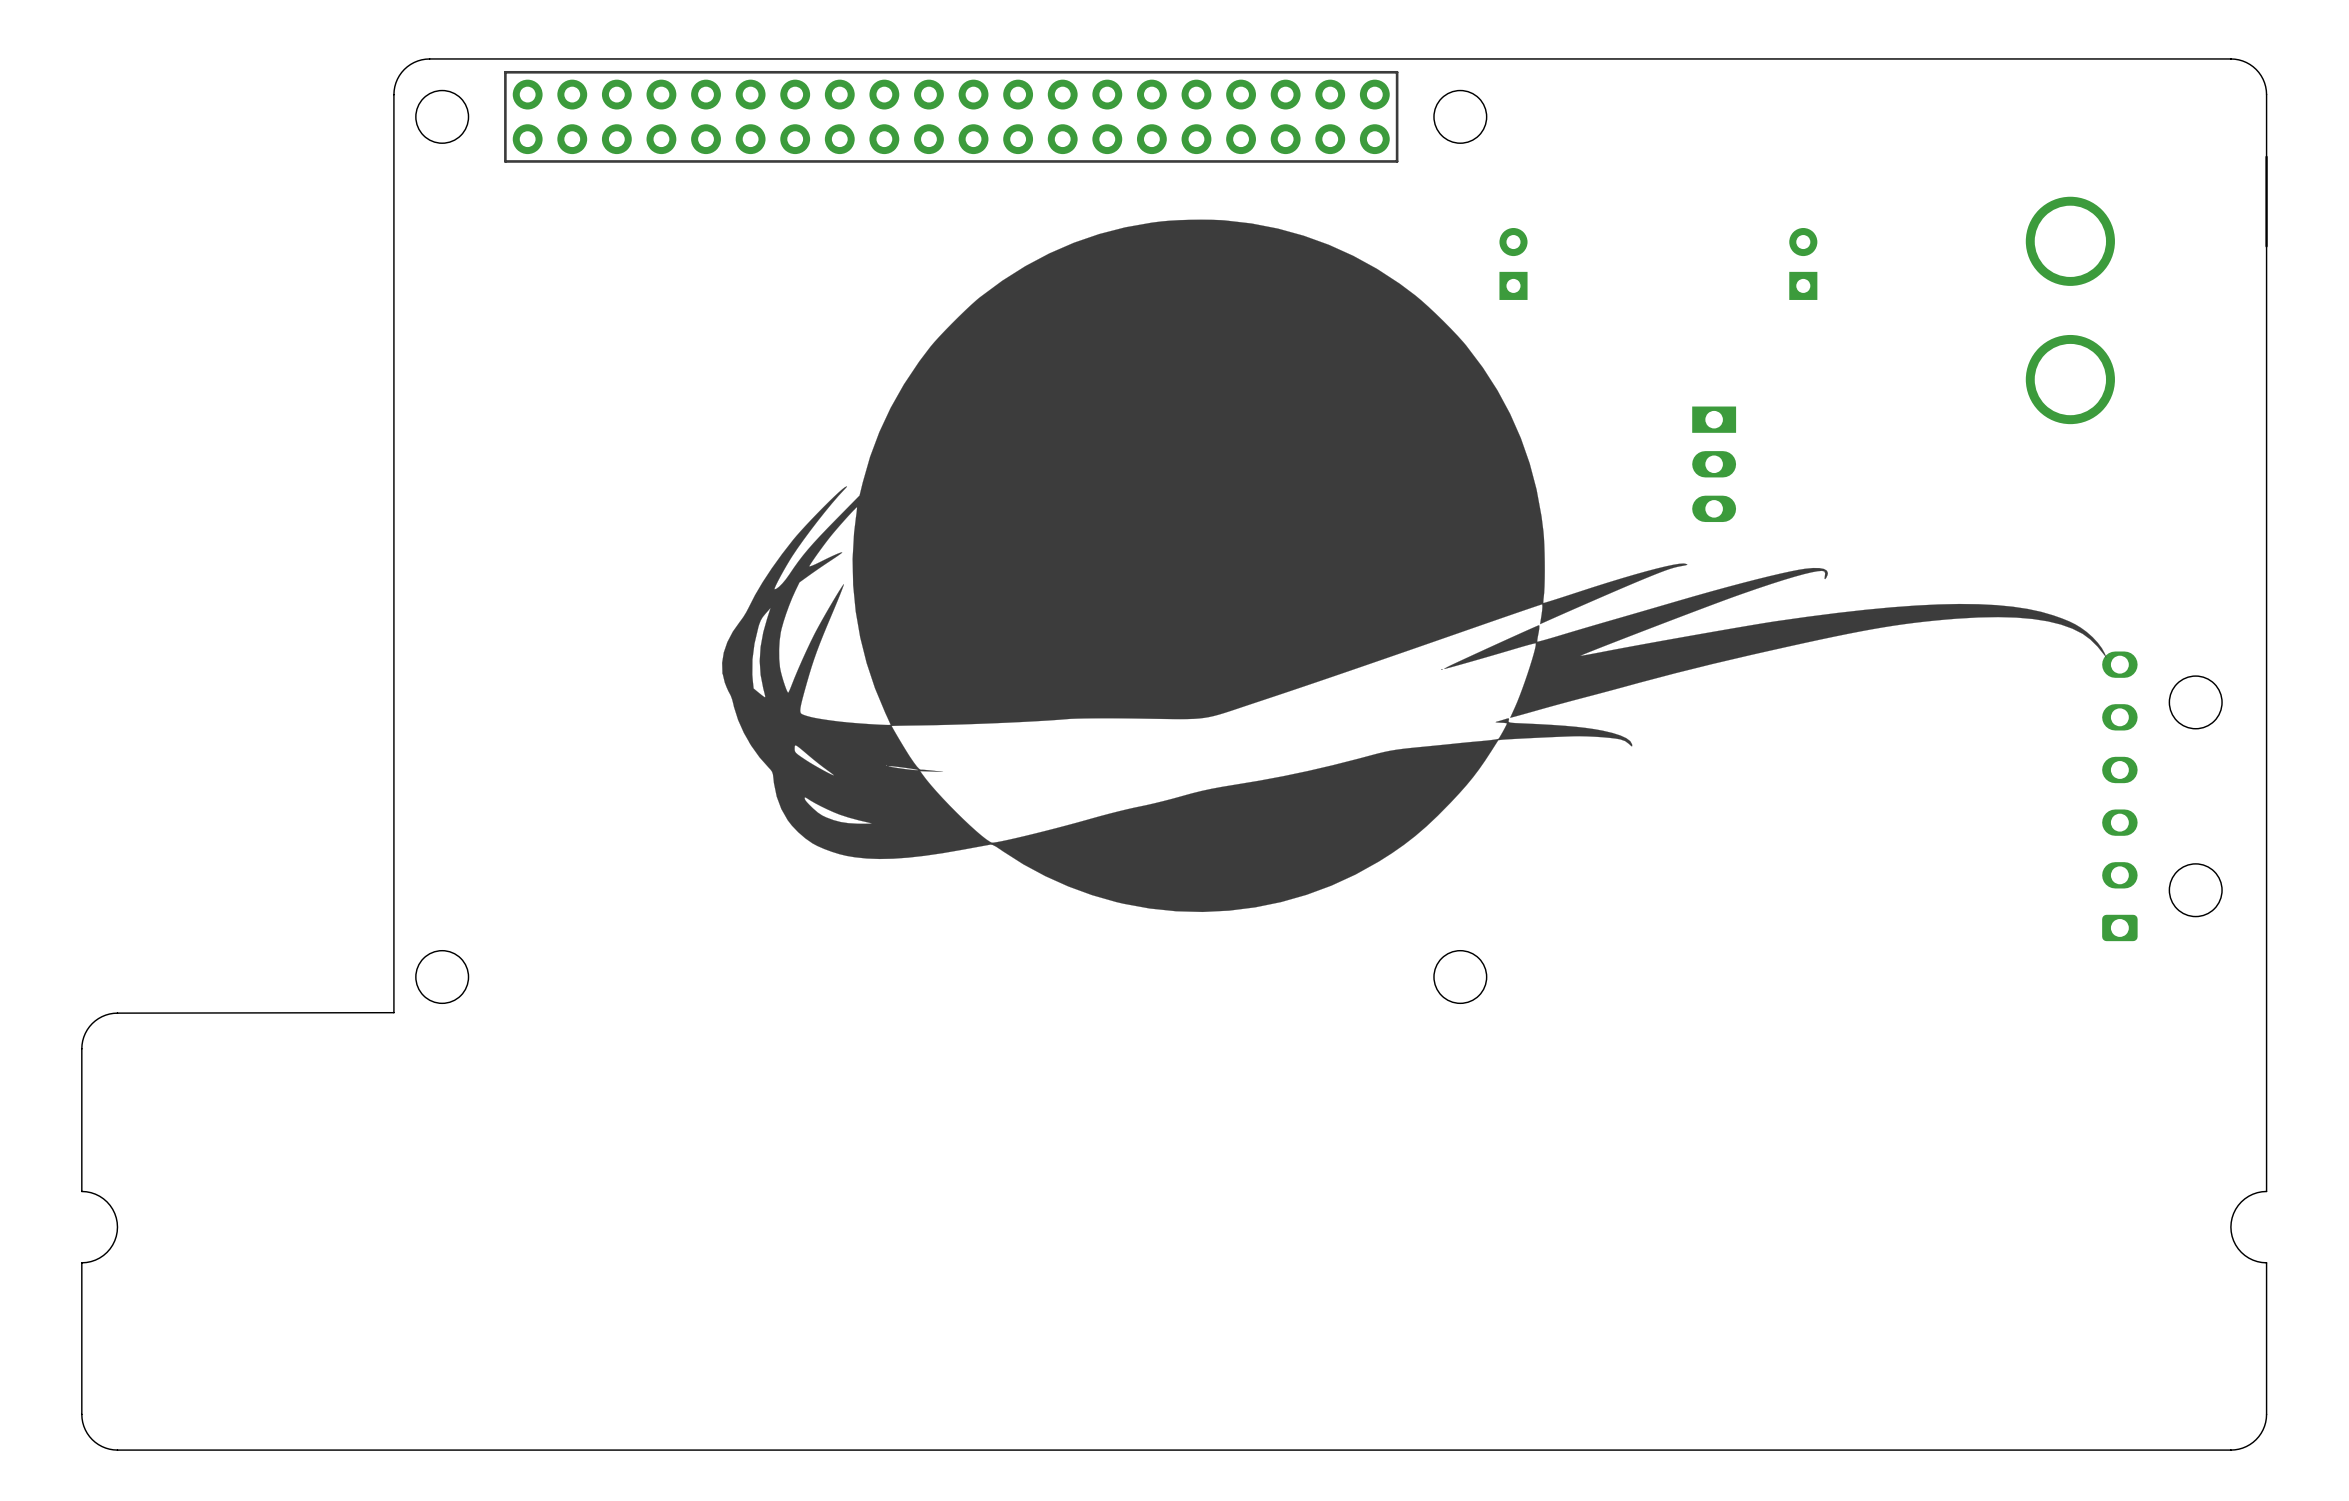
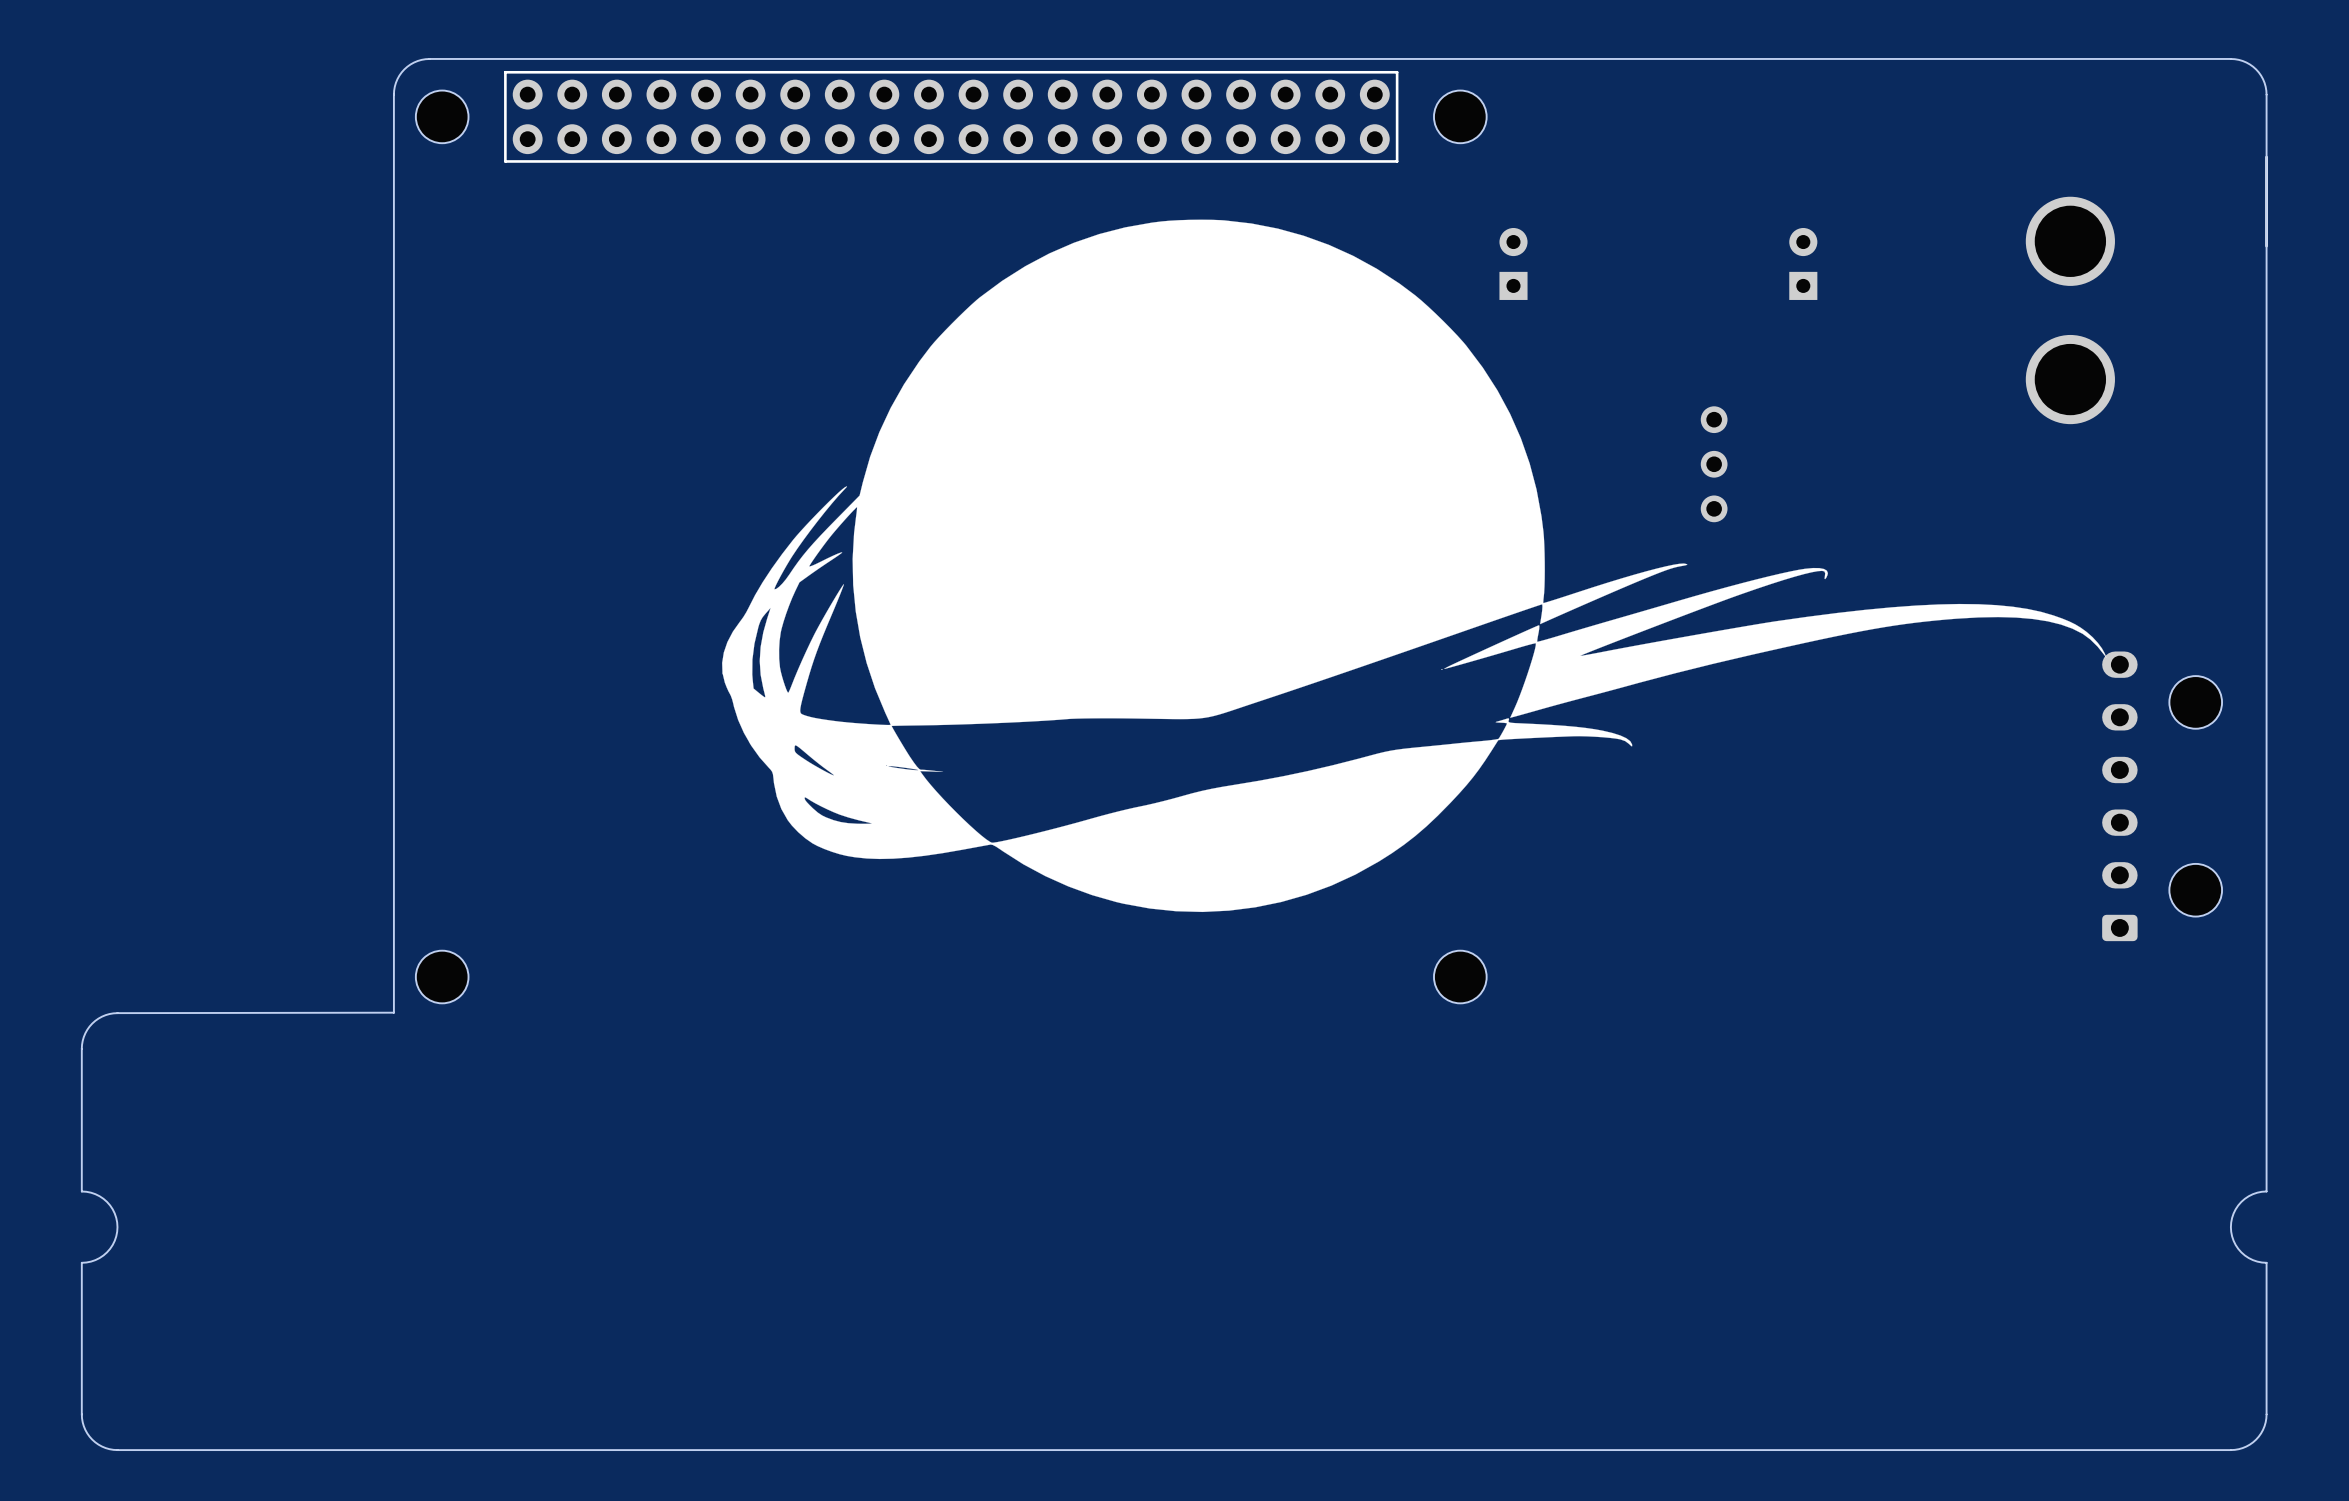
part footprint: [1692, 406, 1737, 523] -> [1700, 406, 1728, 523]

